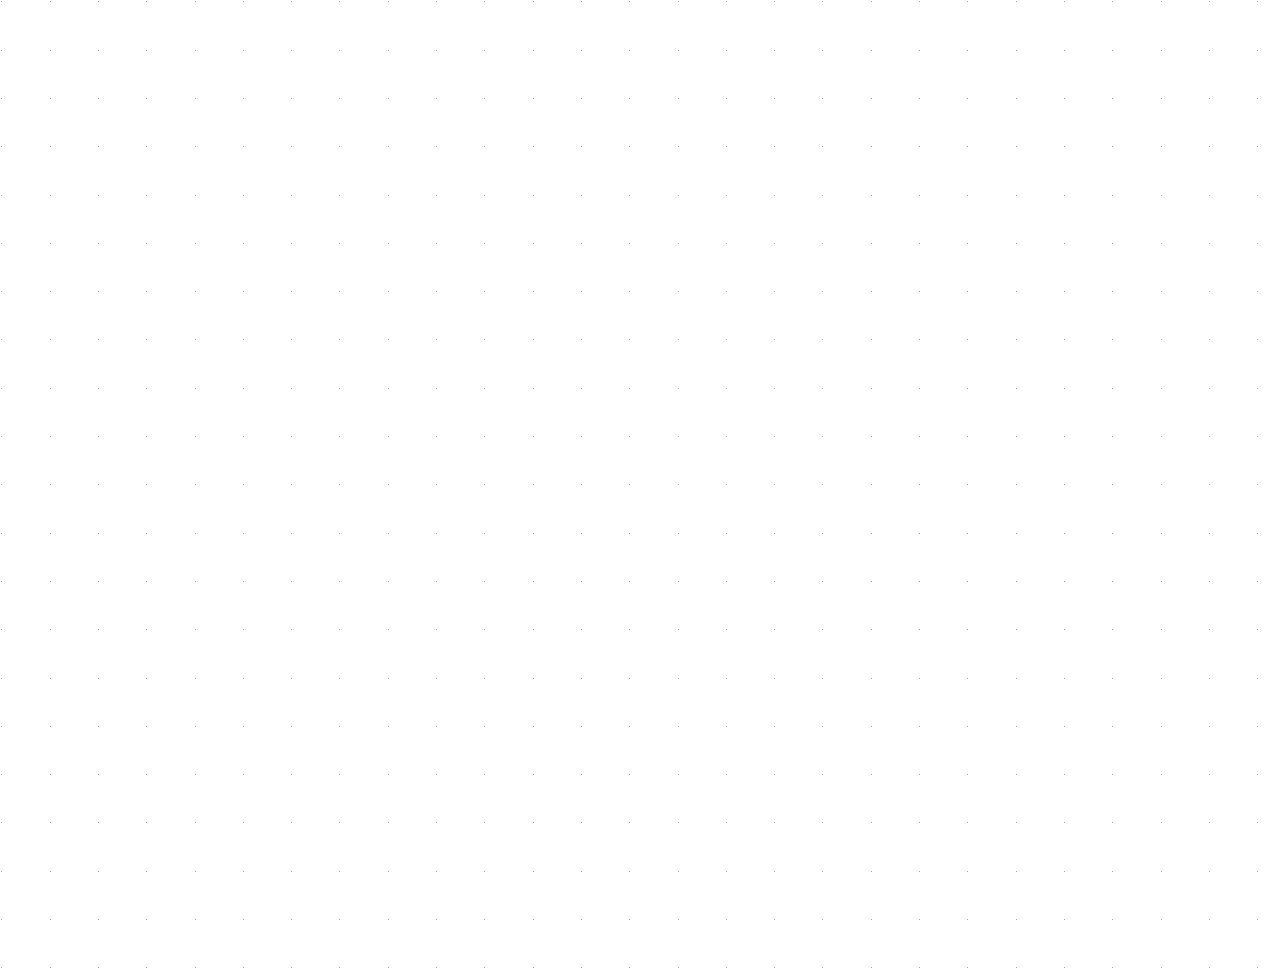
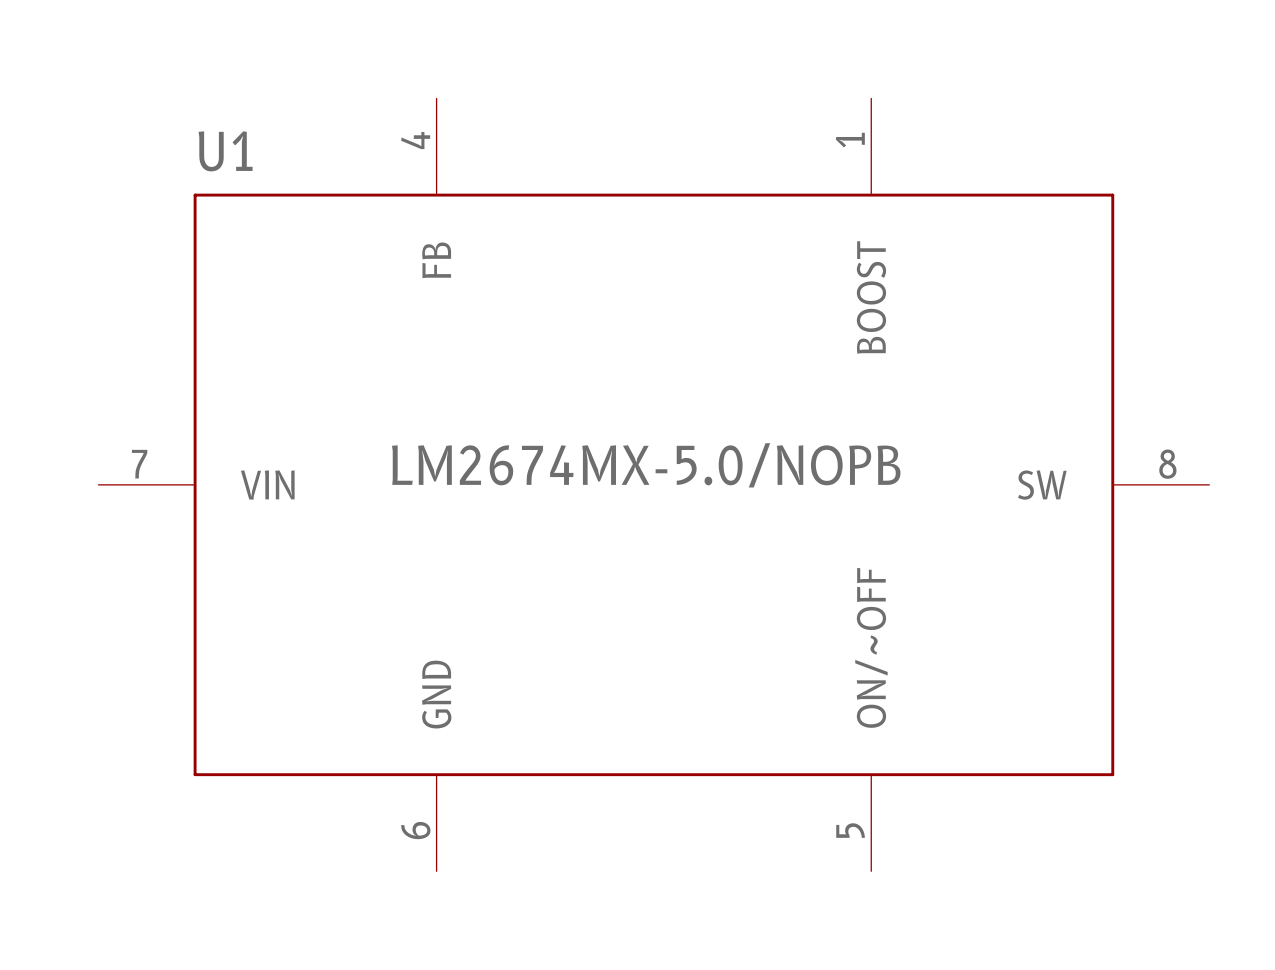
U1: none -> LM2674MX-5.0/NOPB (653, 484)

